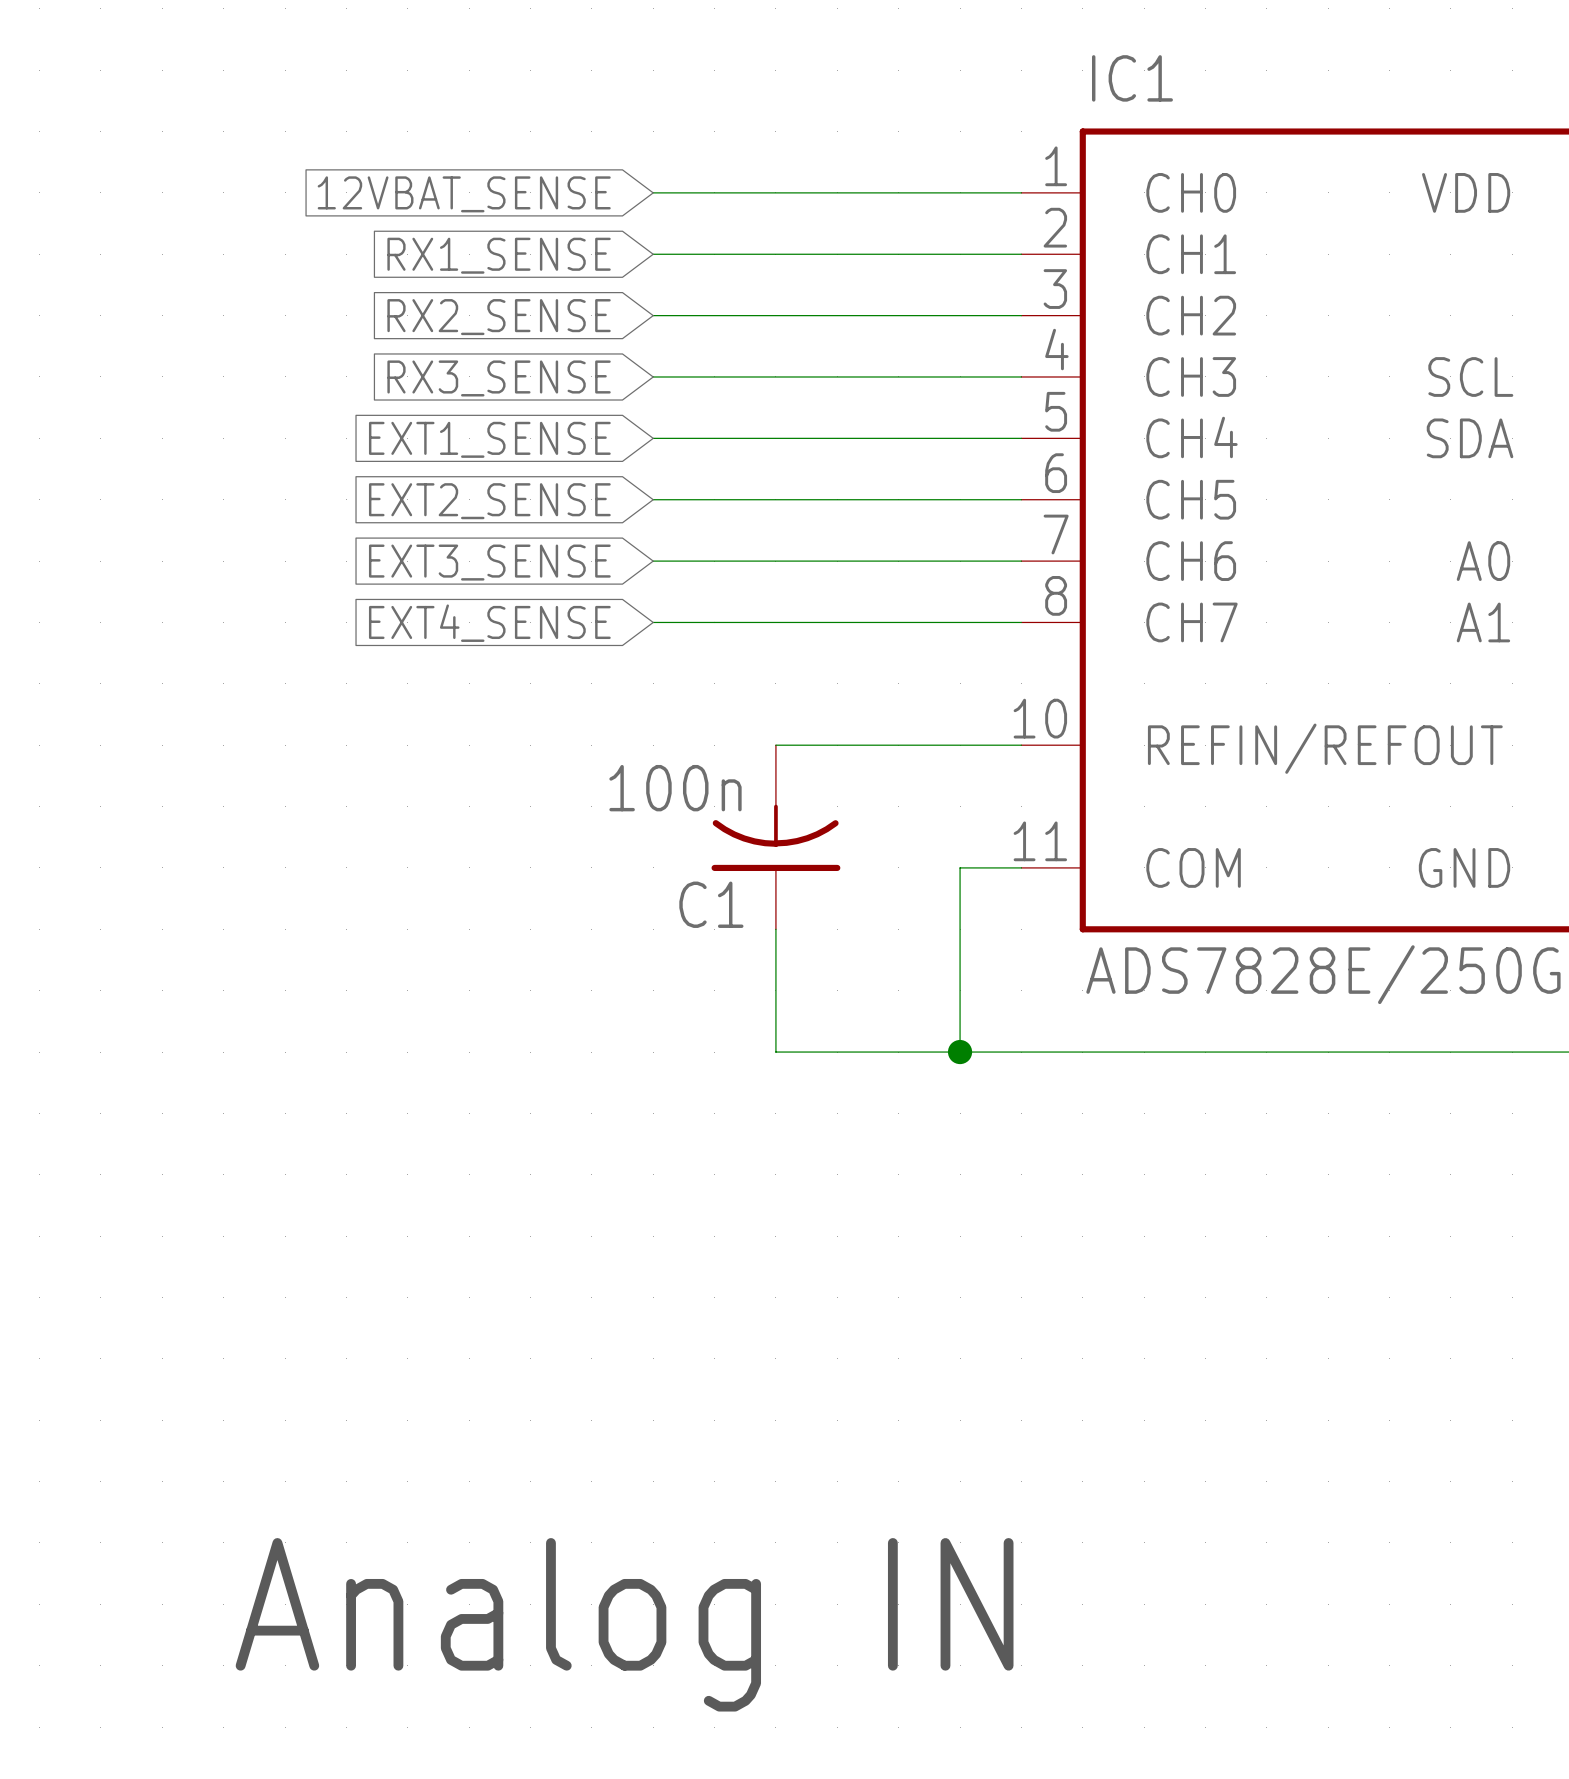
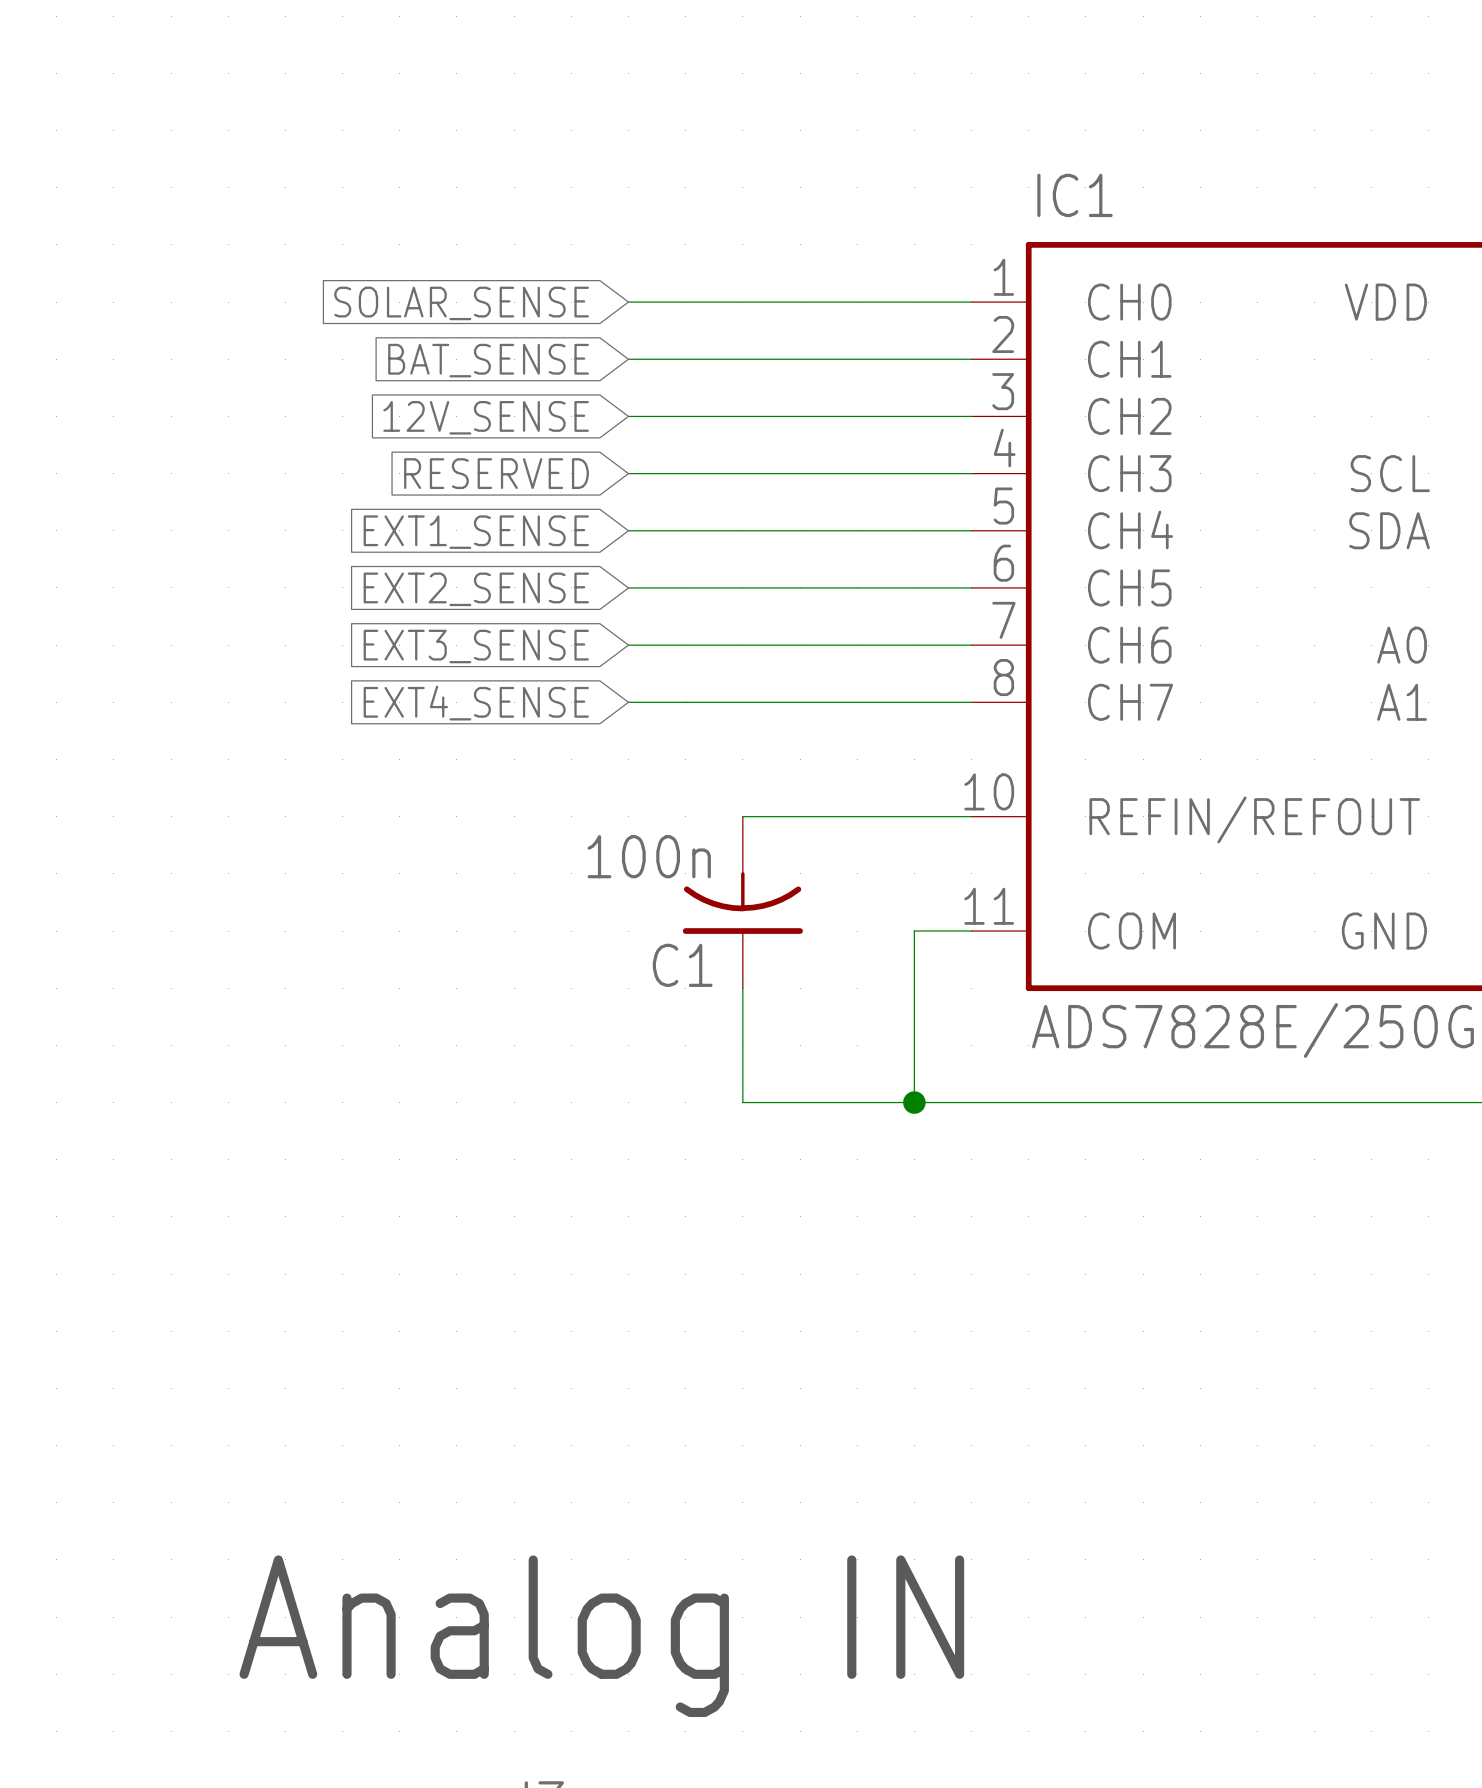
global label: 12VBAT_SENSE (464, 194) -> SOLAR_SENSE (461, 303)
global label: RX1_SENSE (499, 255) -> BAT_SENSE (488, 360)
global label: RX2_SENSE (499, 317) -> 12V_SENSE (486, 417)
global label: RX3_SENSE (499, 378) -> RESERVED (496, 473)

